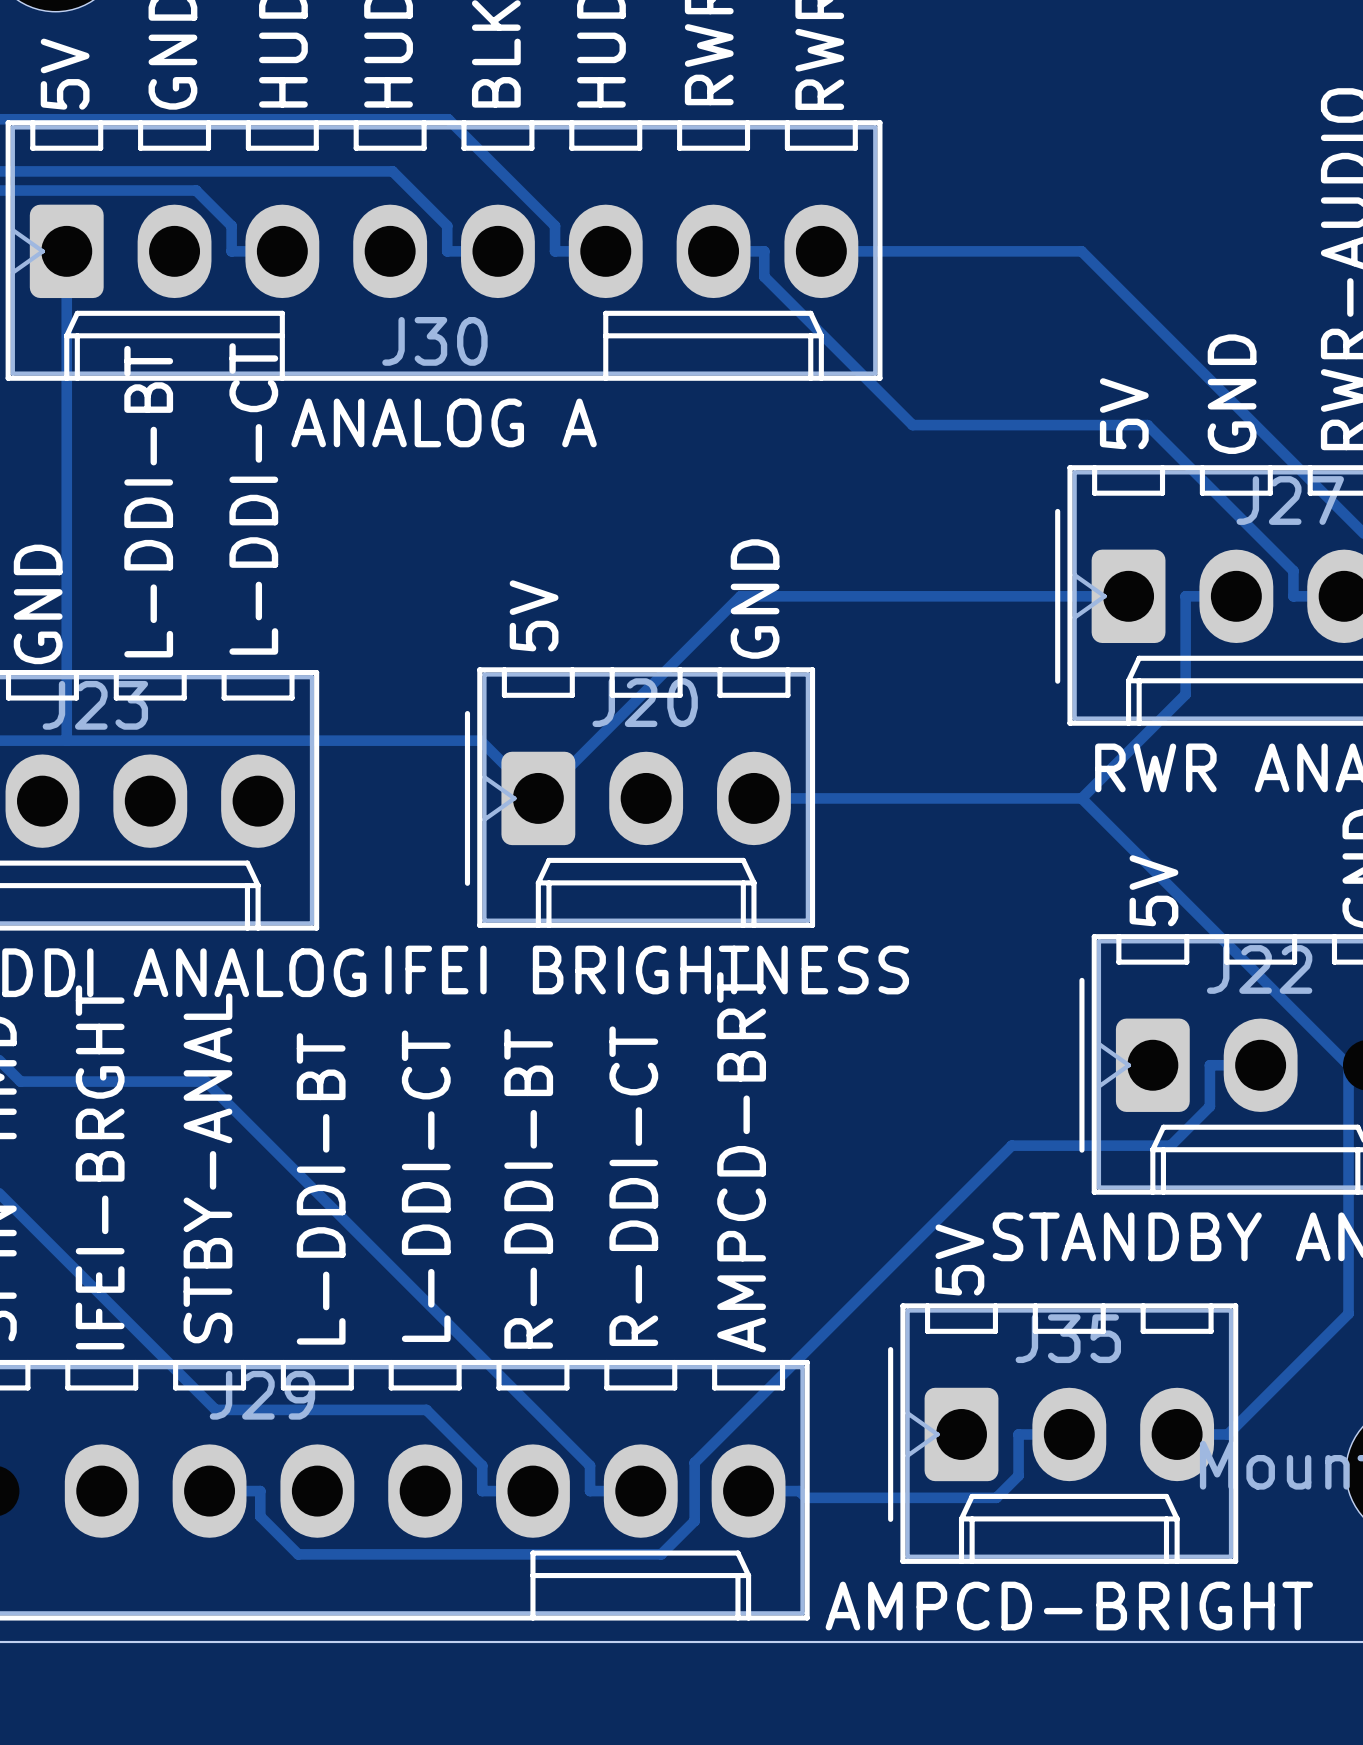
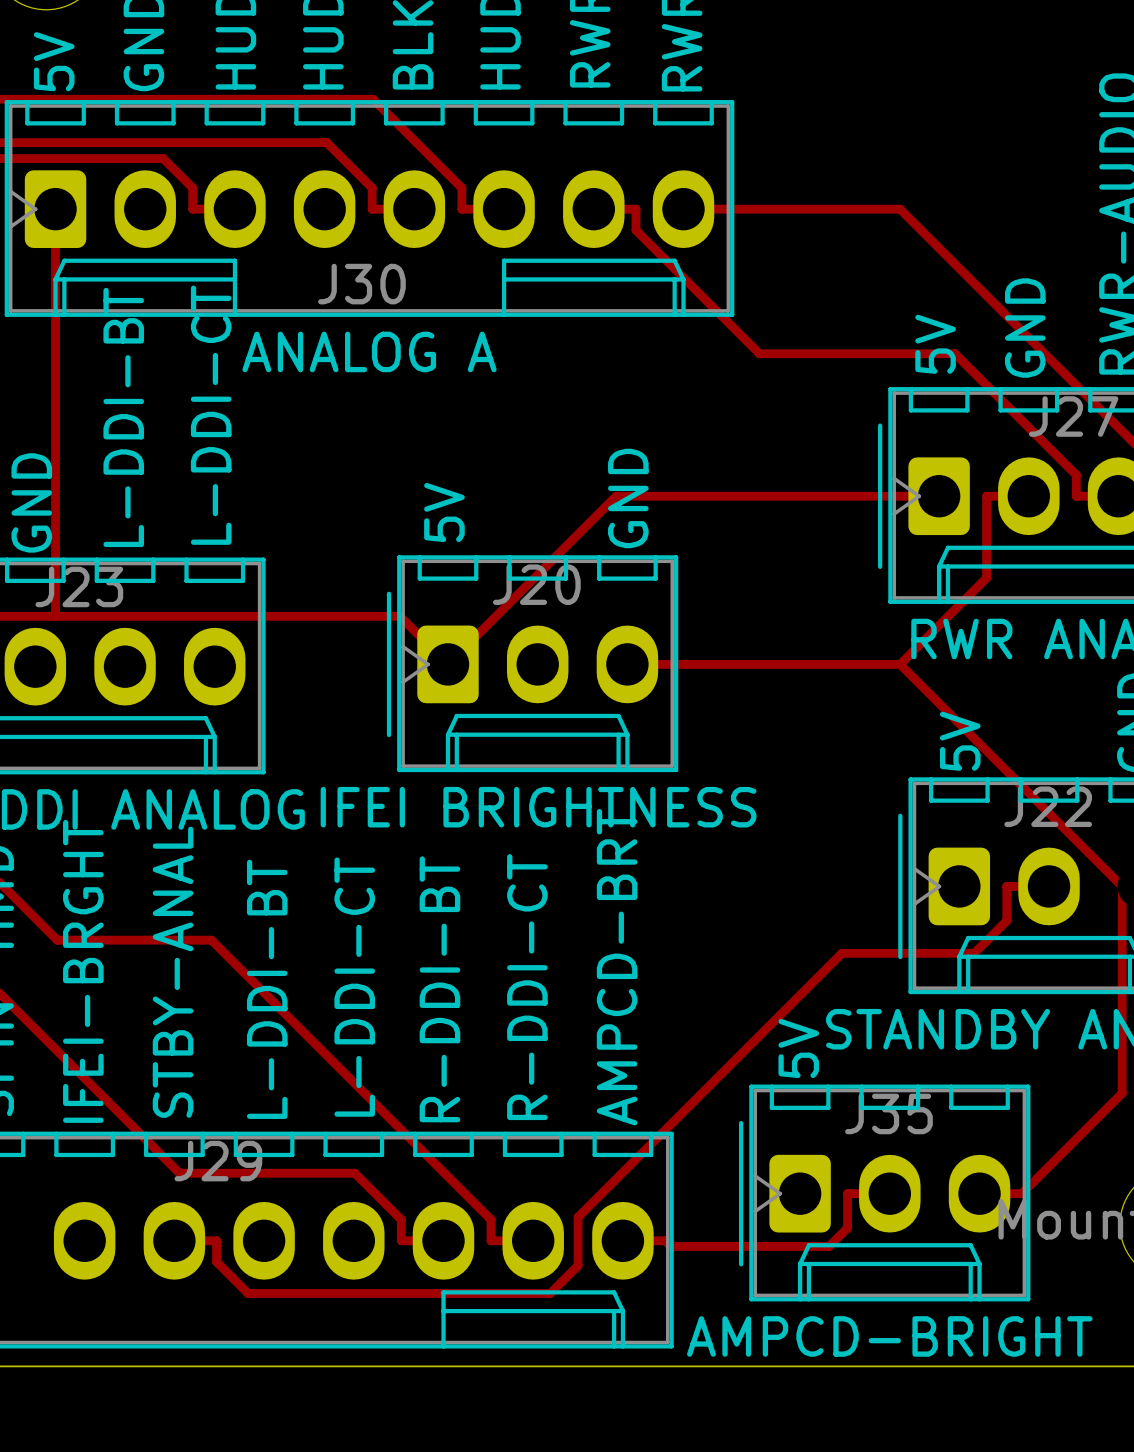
track: (20, 1081) (205, 1081) (254, 1129) -> (17, 900) (57, 940) (211, 940)

